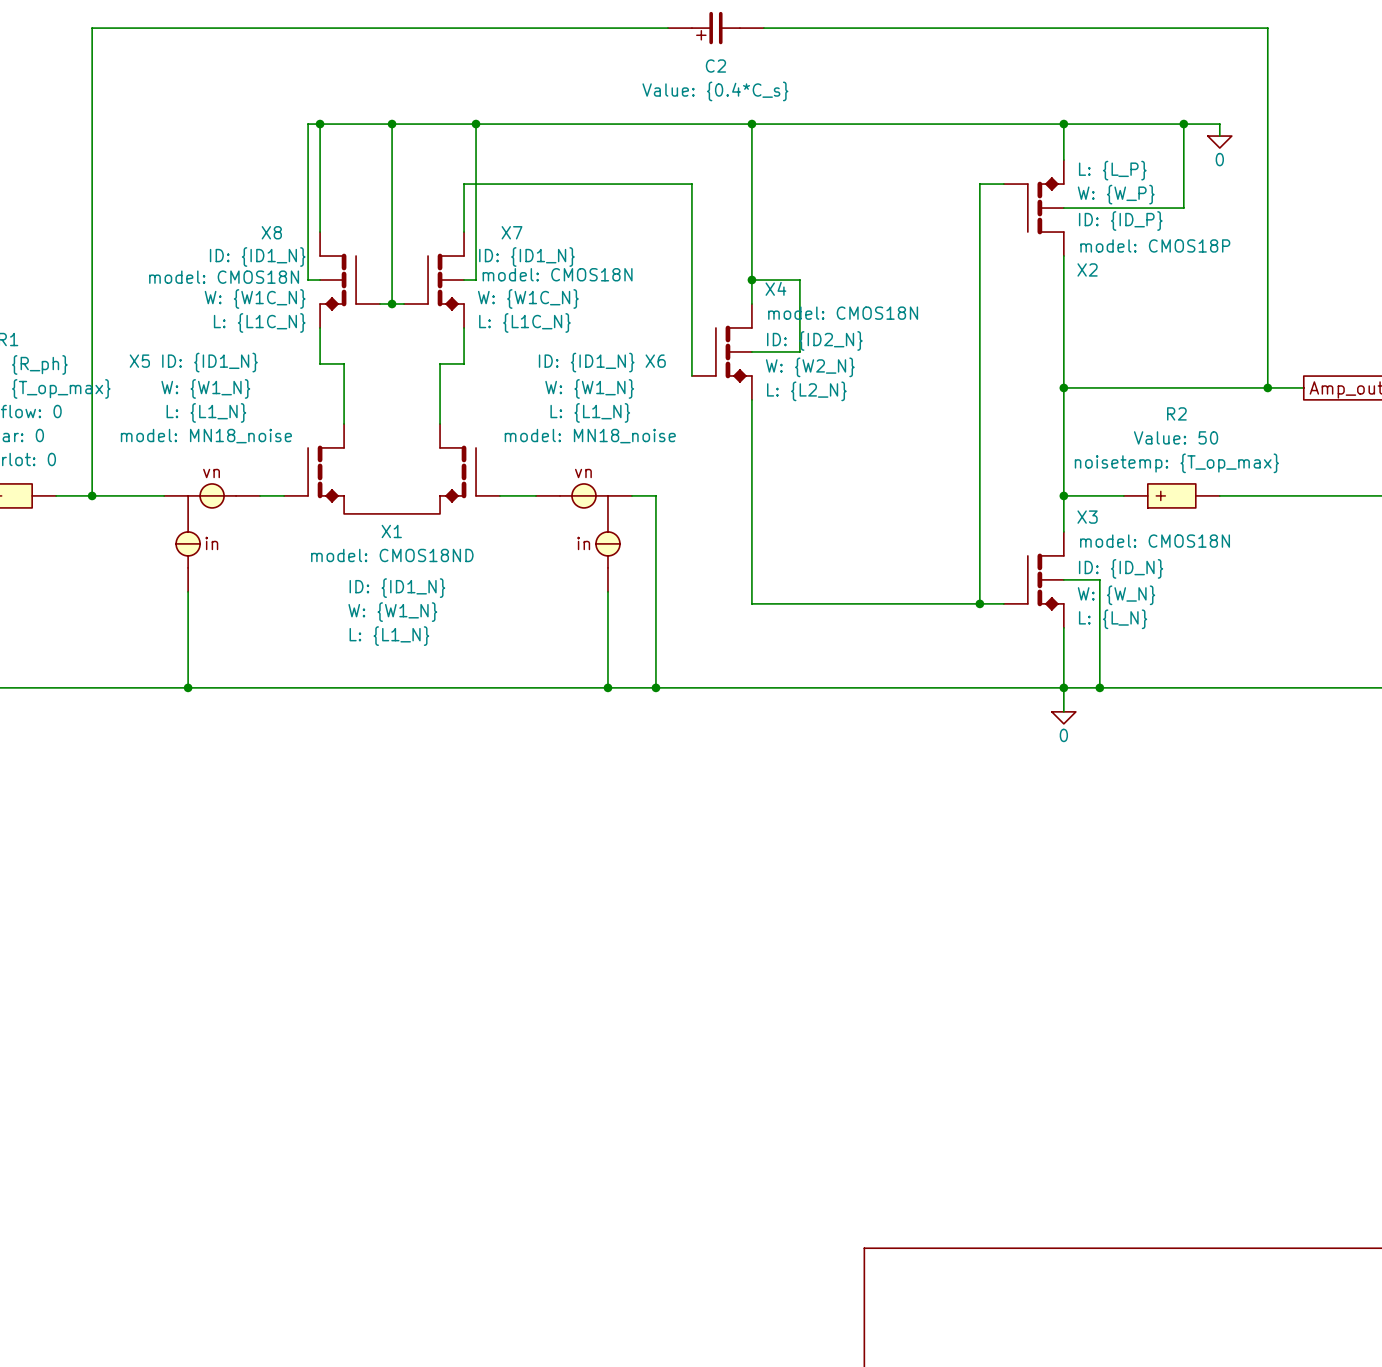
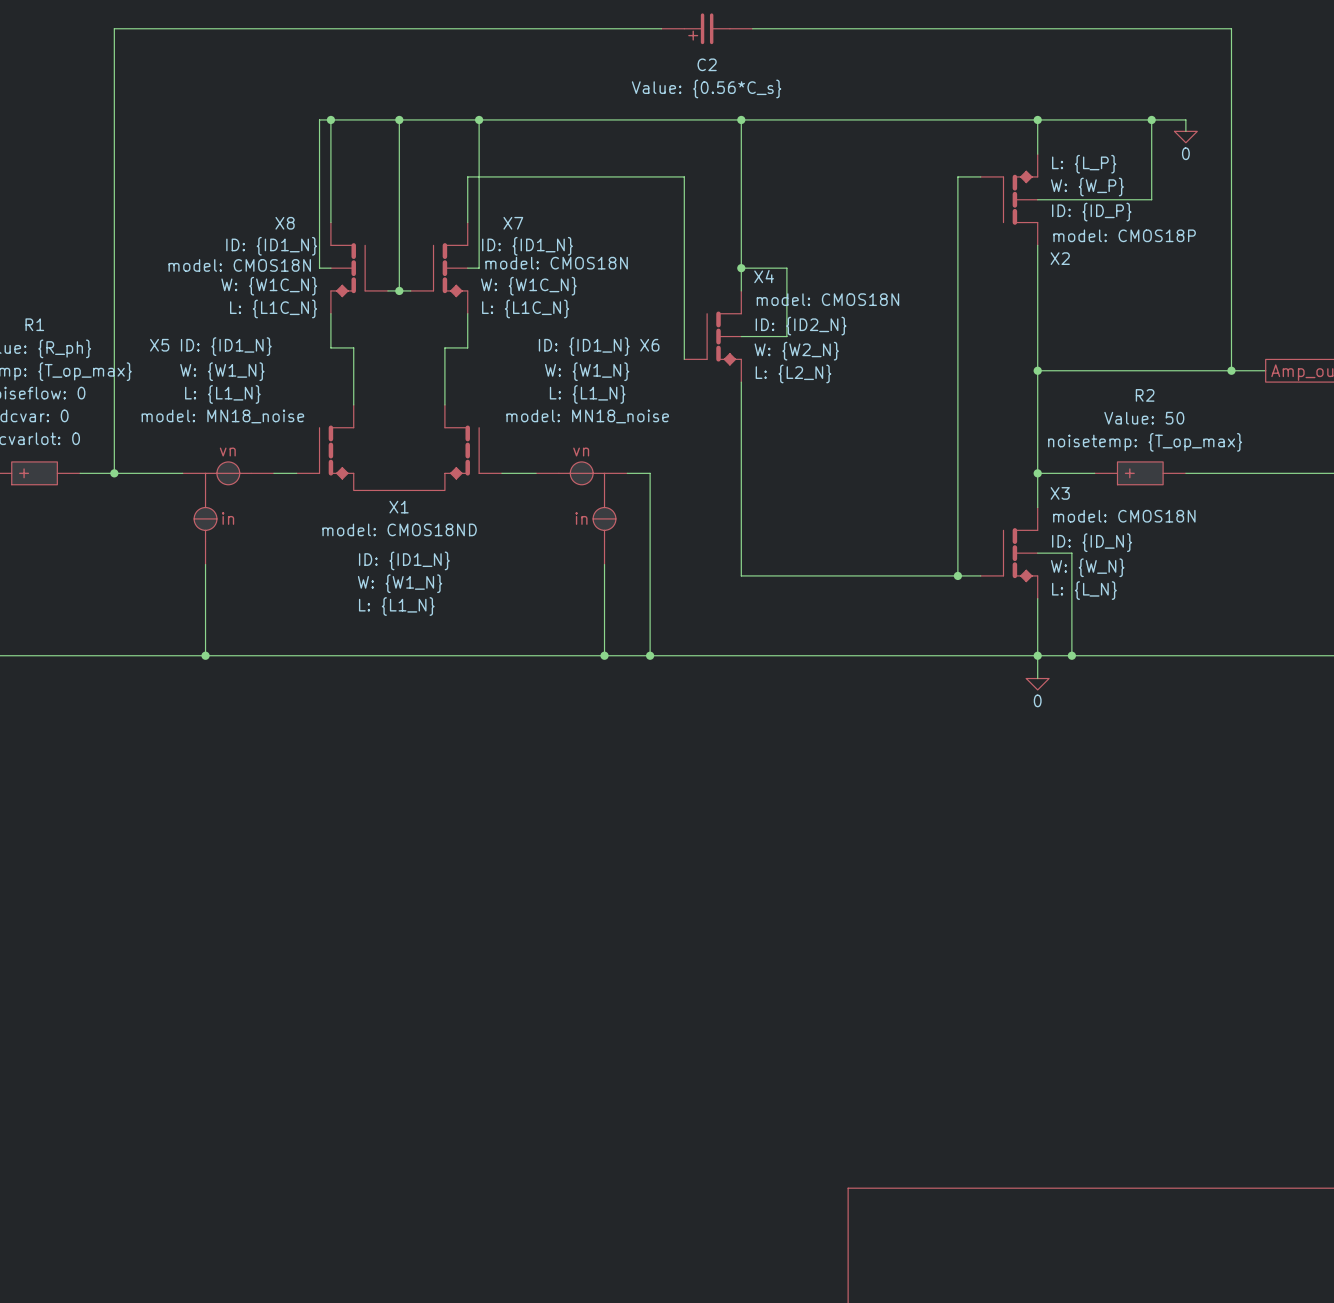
C2 value: Value: {0.4*C_s} (715, 91) -> Value: {0.56*C_s} (706, 88)

